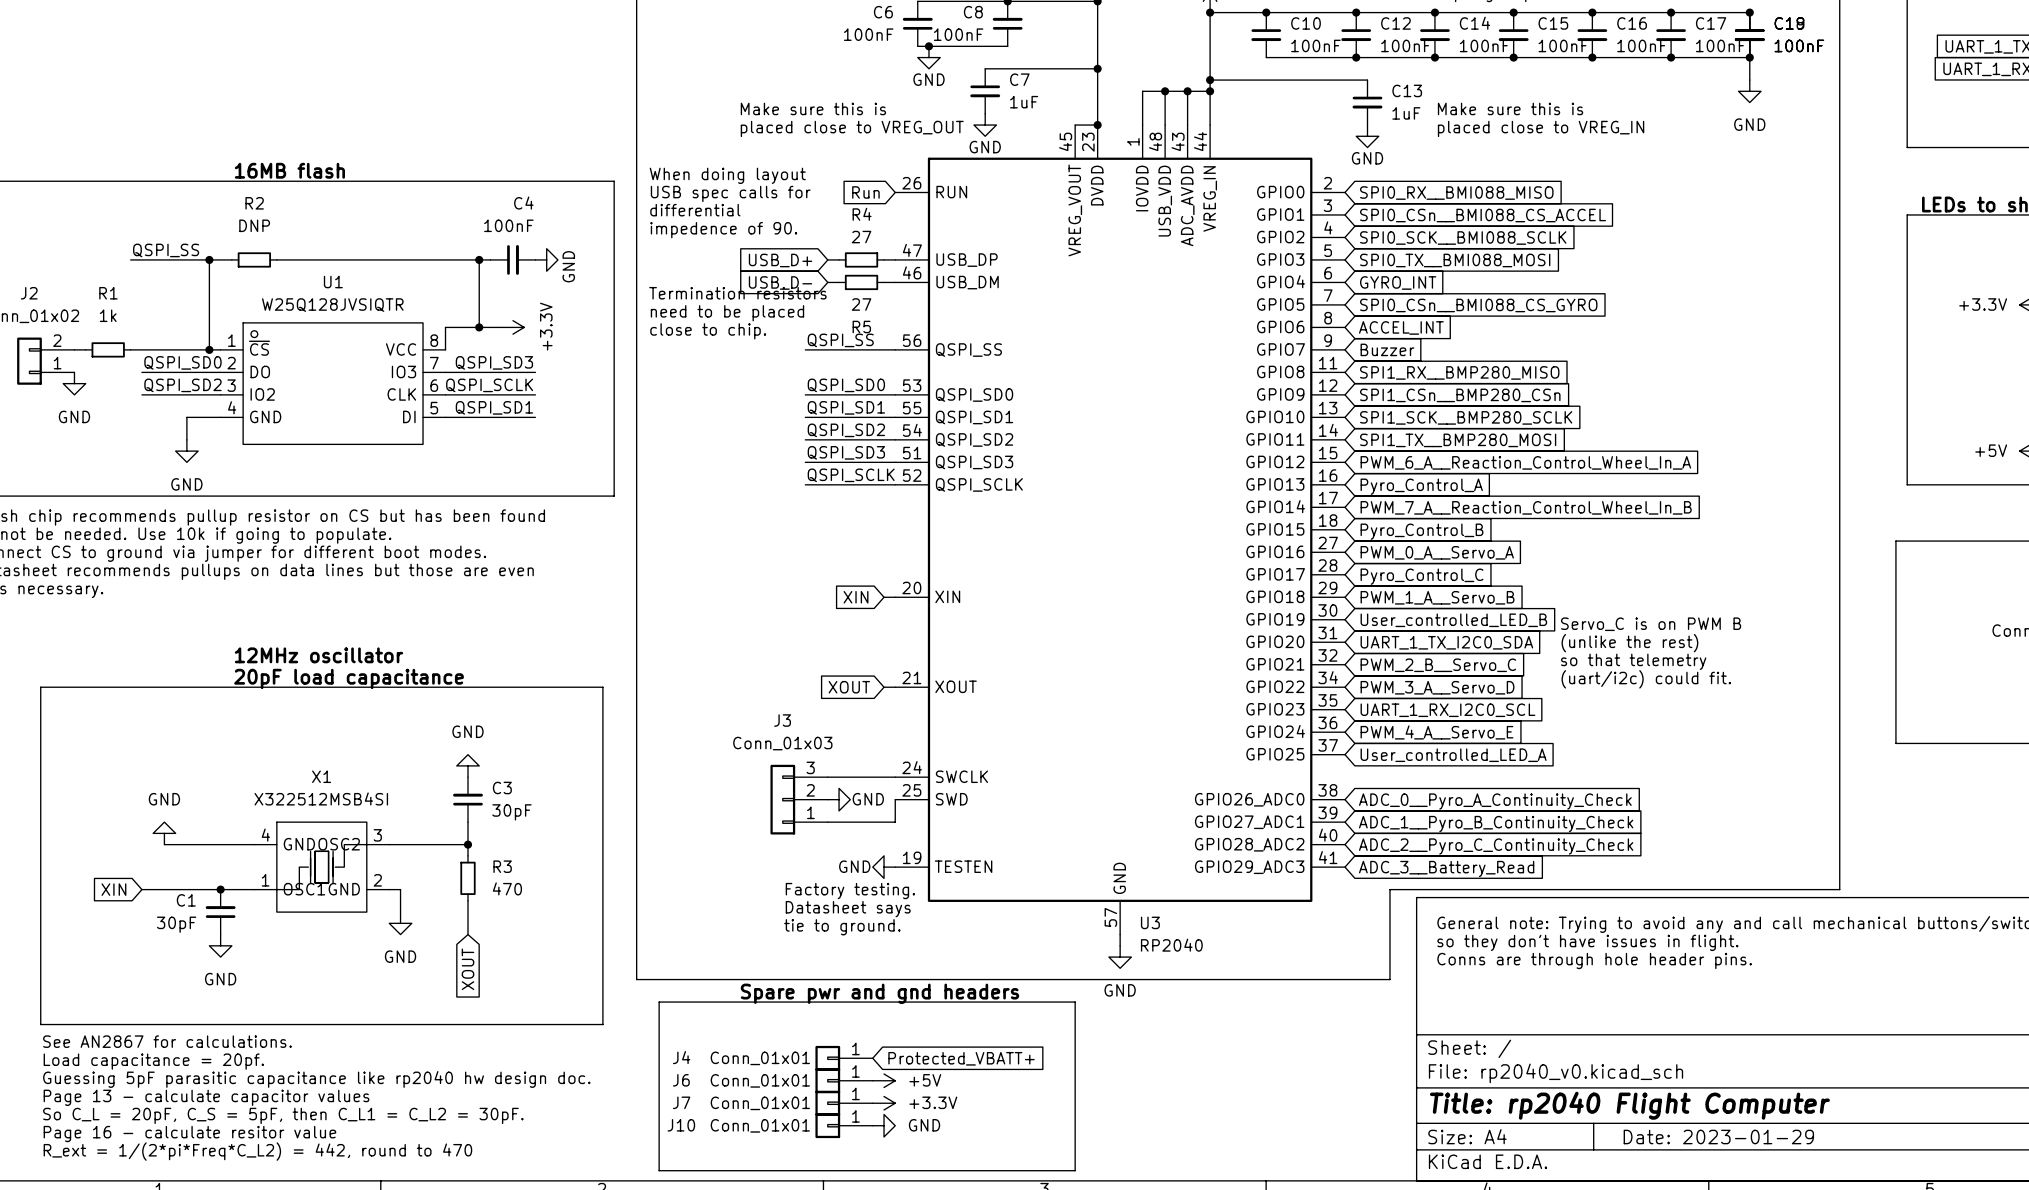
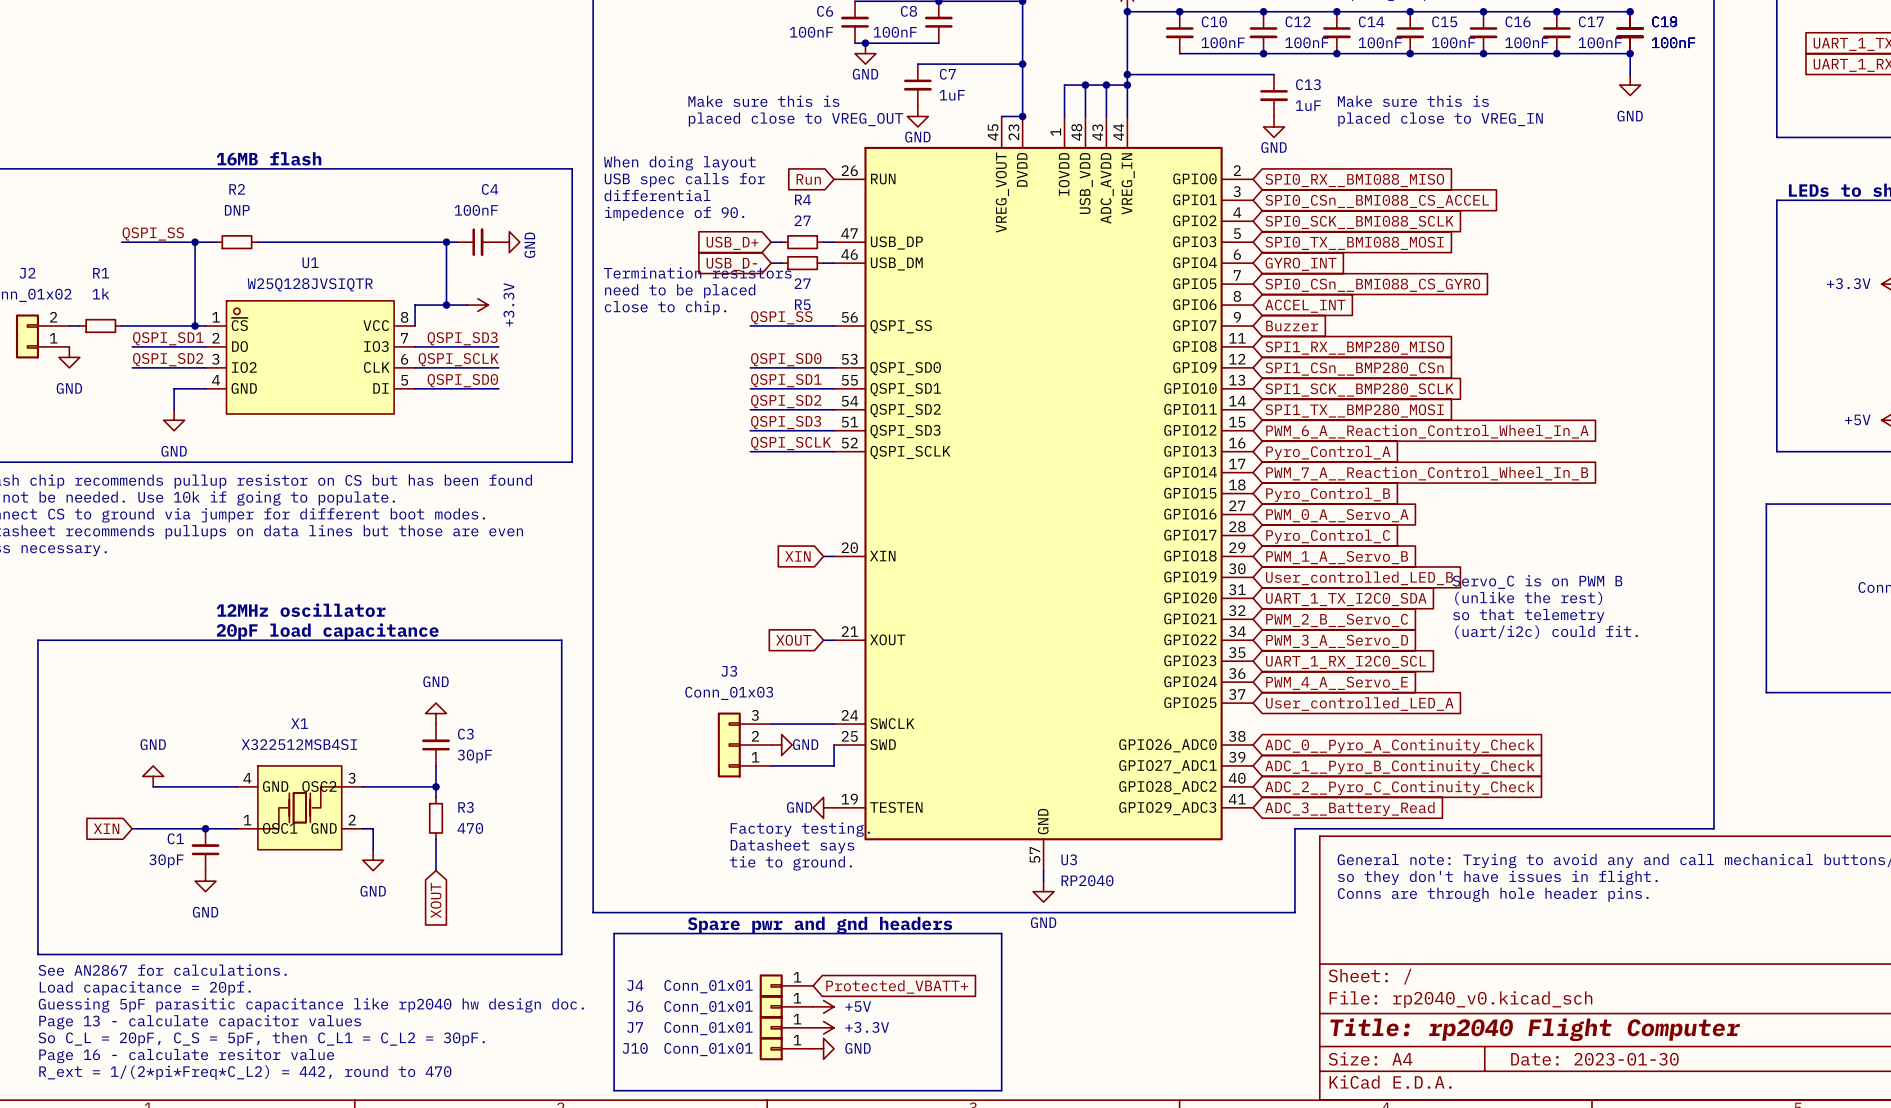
label: QSPI_SD0 (182, 362) -> QSPI_SD1 (168, 338)
label: QSPI_SD1 (494, 407) -> QSPI_SD0 (462, 380)
title block: Date: 2023-01-29 (1718, 1137) -> Date: 2023-01-30 (1594, 1059)

